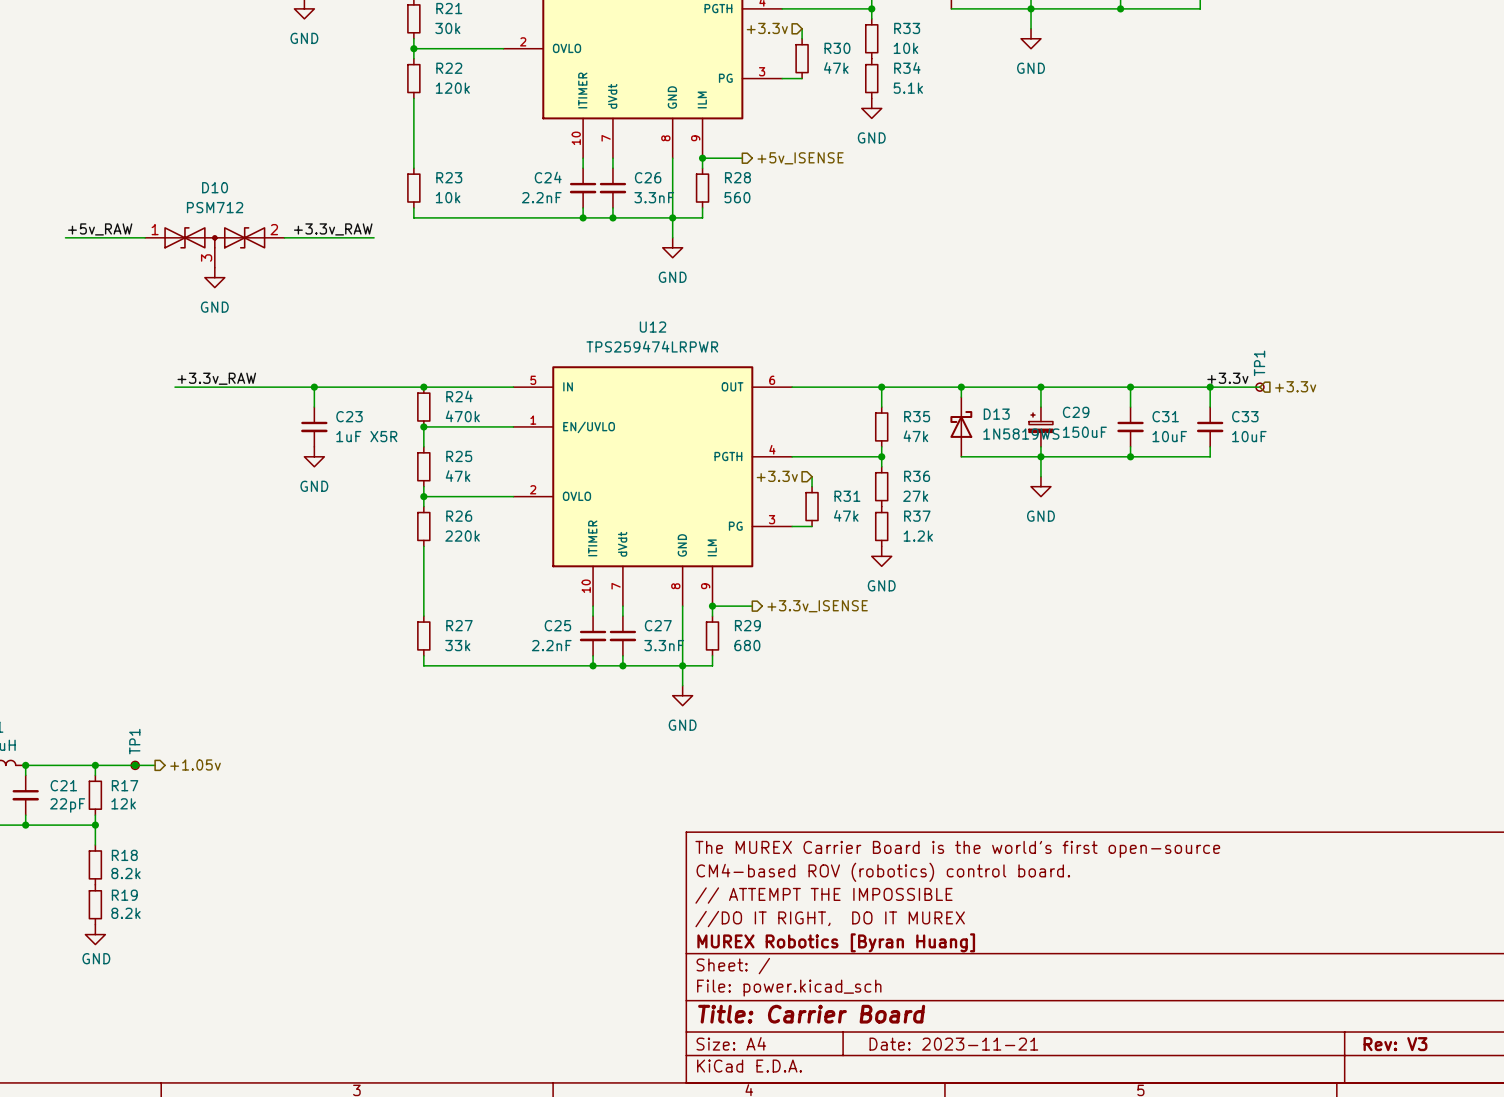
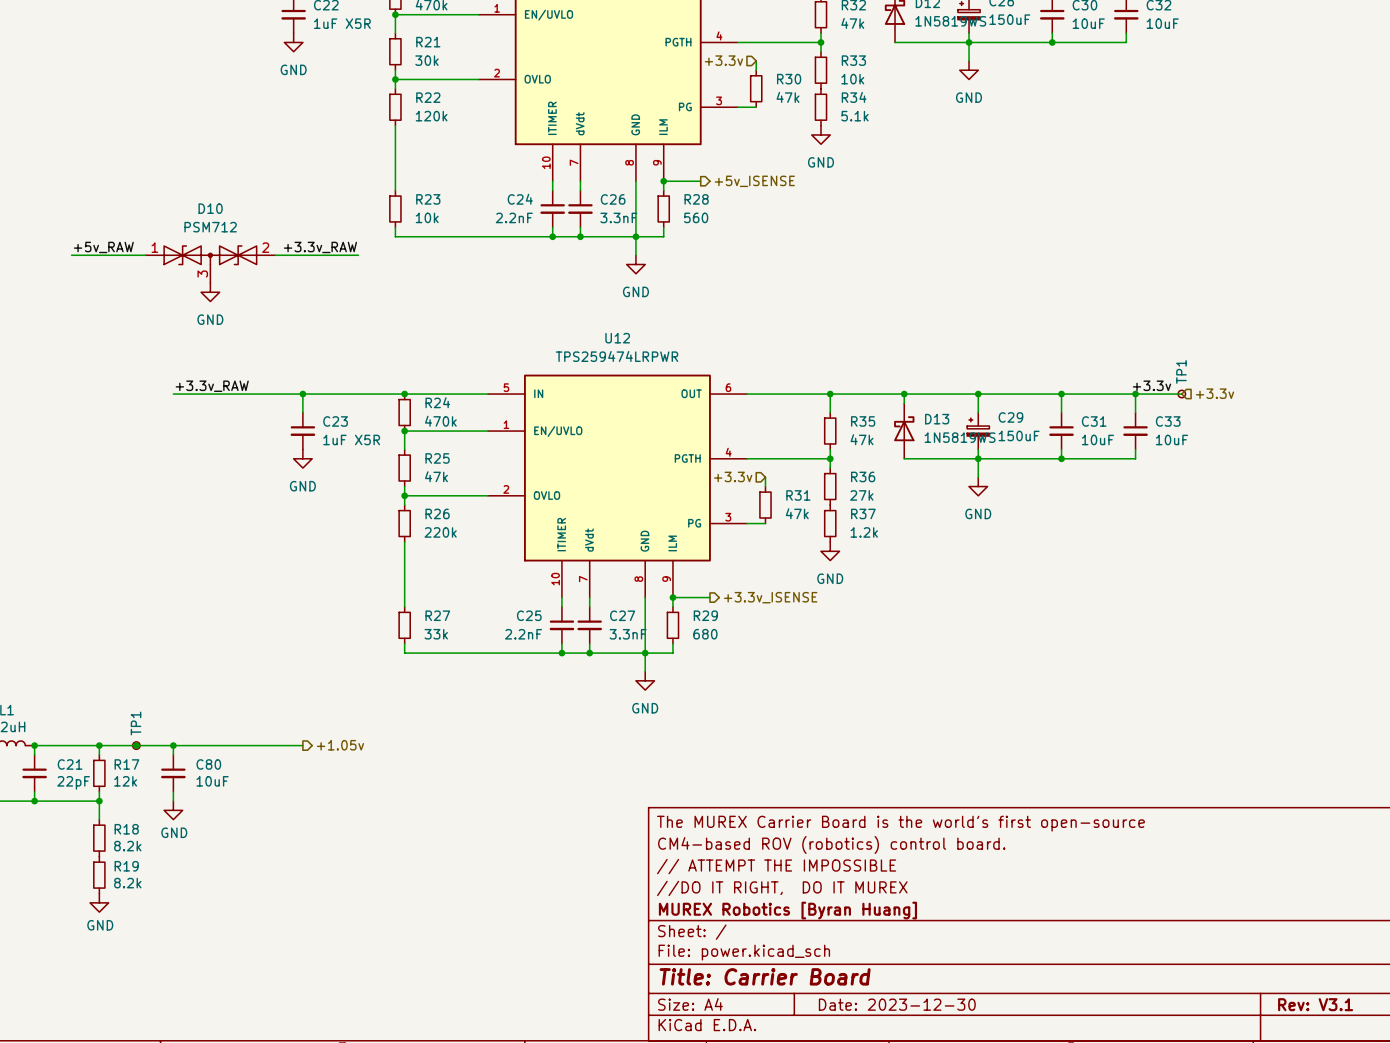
wire: none -> (154, 745) (302, 745)
wire: none -> (173, 745) (173, 754)
junction: none -> (173, 745)
hierarchical label position: +1.05v (195, 765) -> +1.05v (340, 745)
C80: none -> 10uF (173, 773)
wire: none -> (173, 791) (173, 801)
power symbol: none -> GND (173, 810)
title block: Date: 2023-11-21 (953, 1044) -> Date: 2023-12-30 (897, 1004)
title block: Rev: V3 (1395, 1044) -> Rev: V3.1 (1315, 1004)

